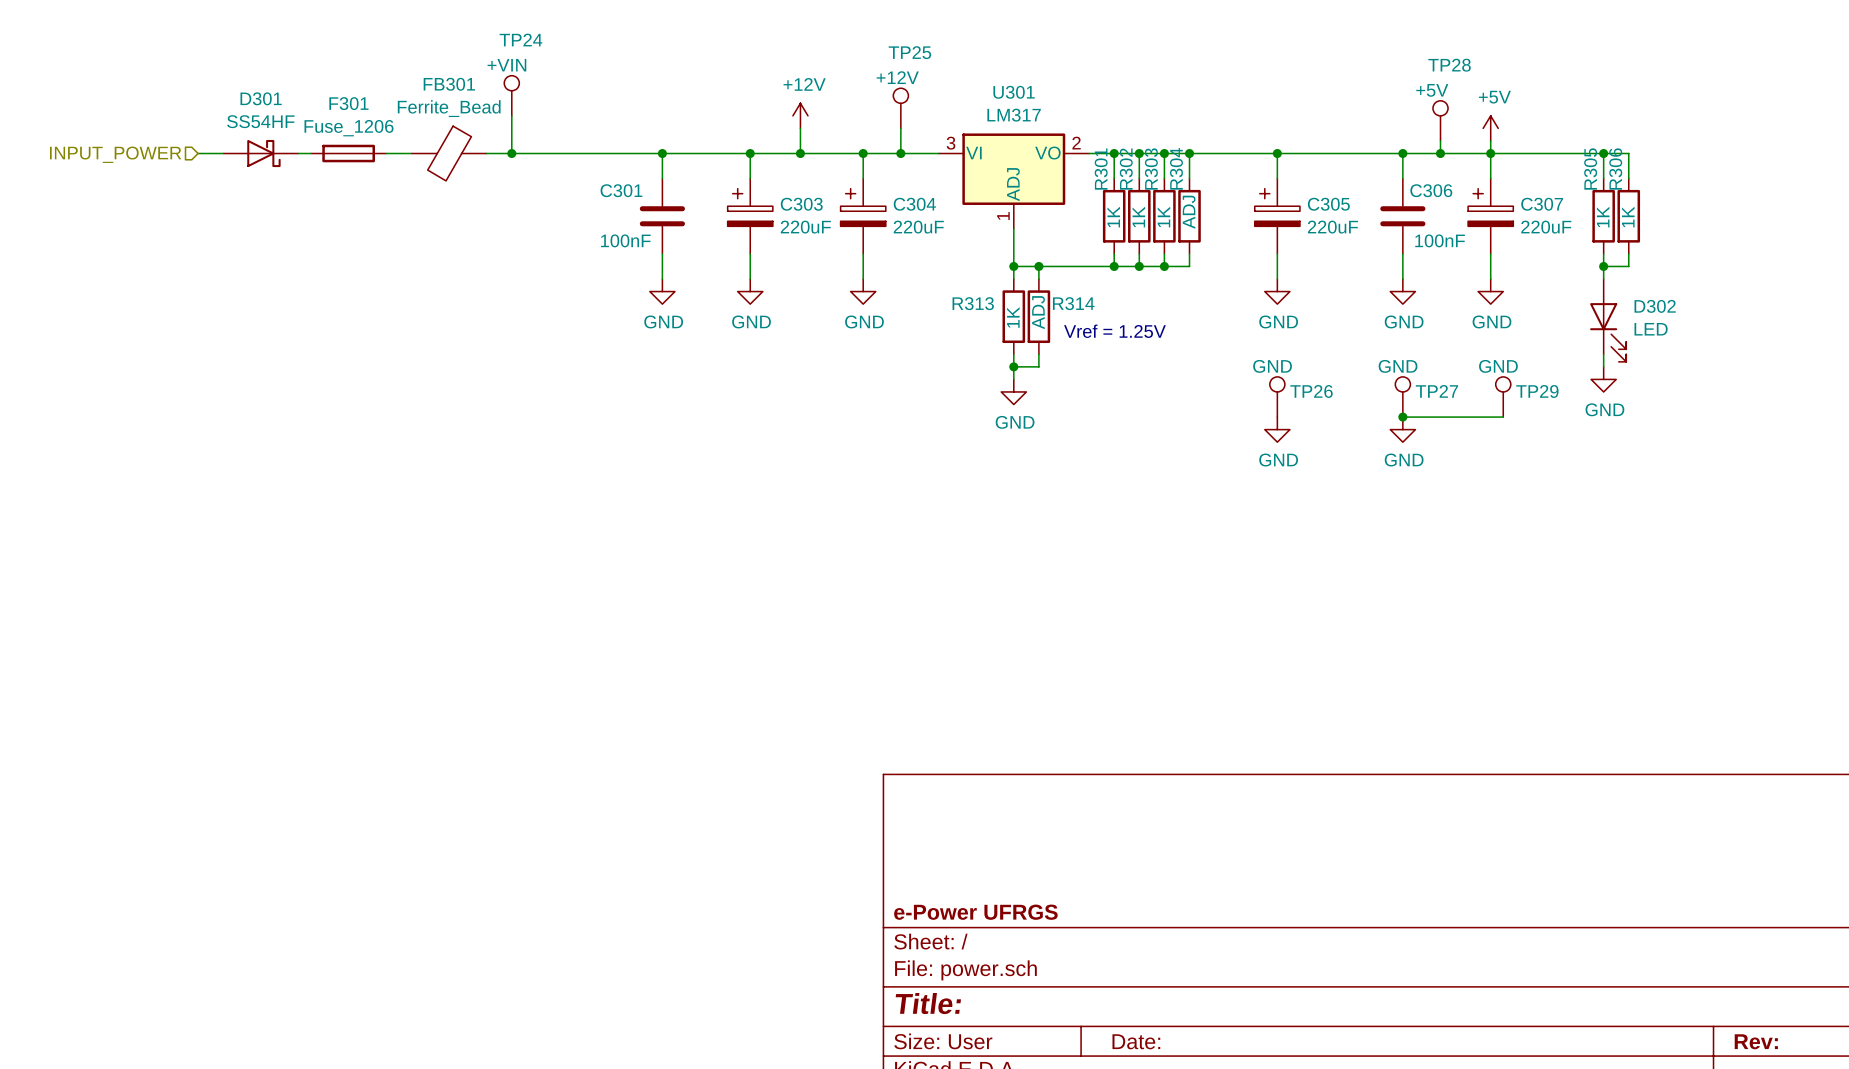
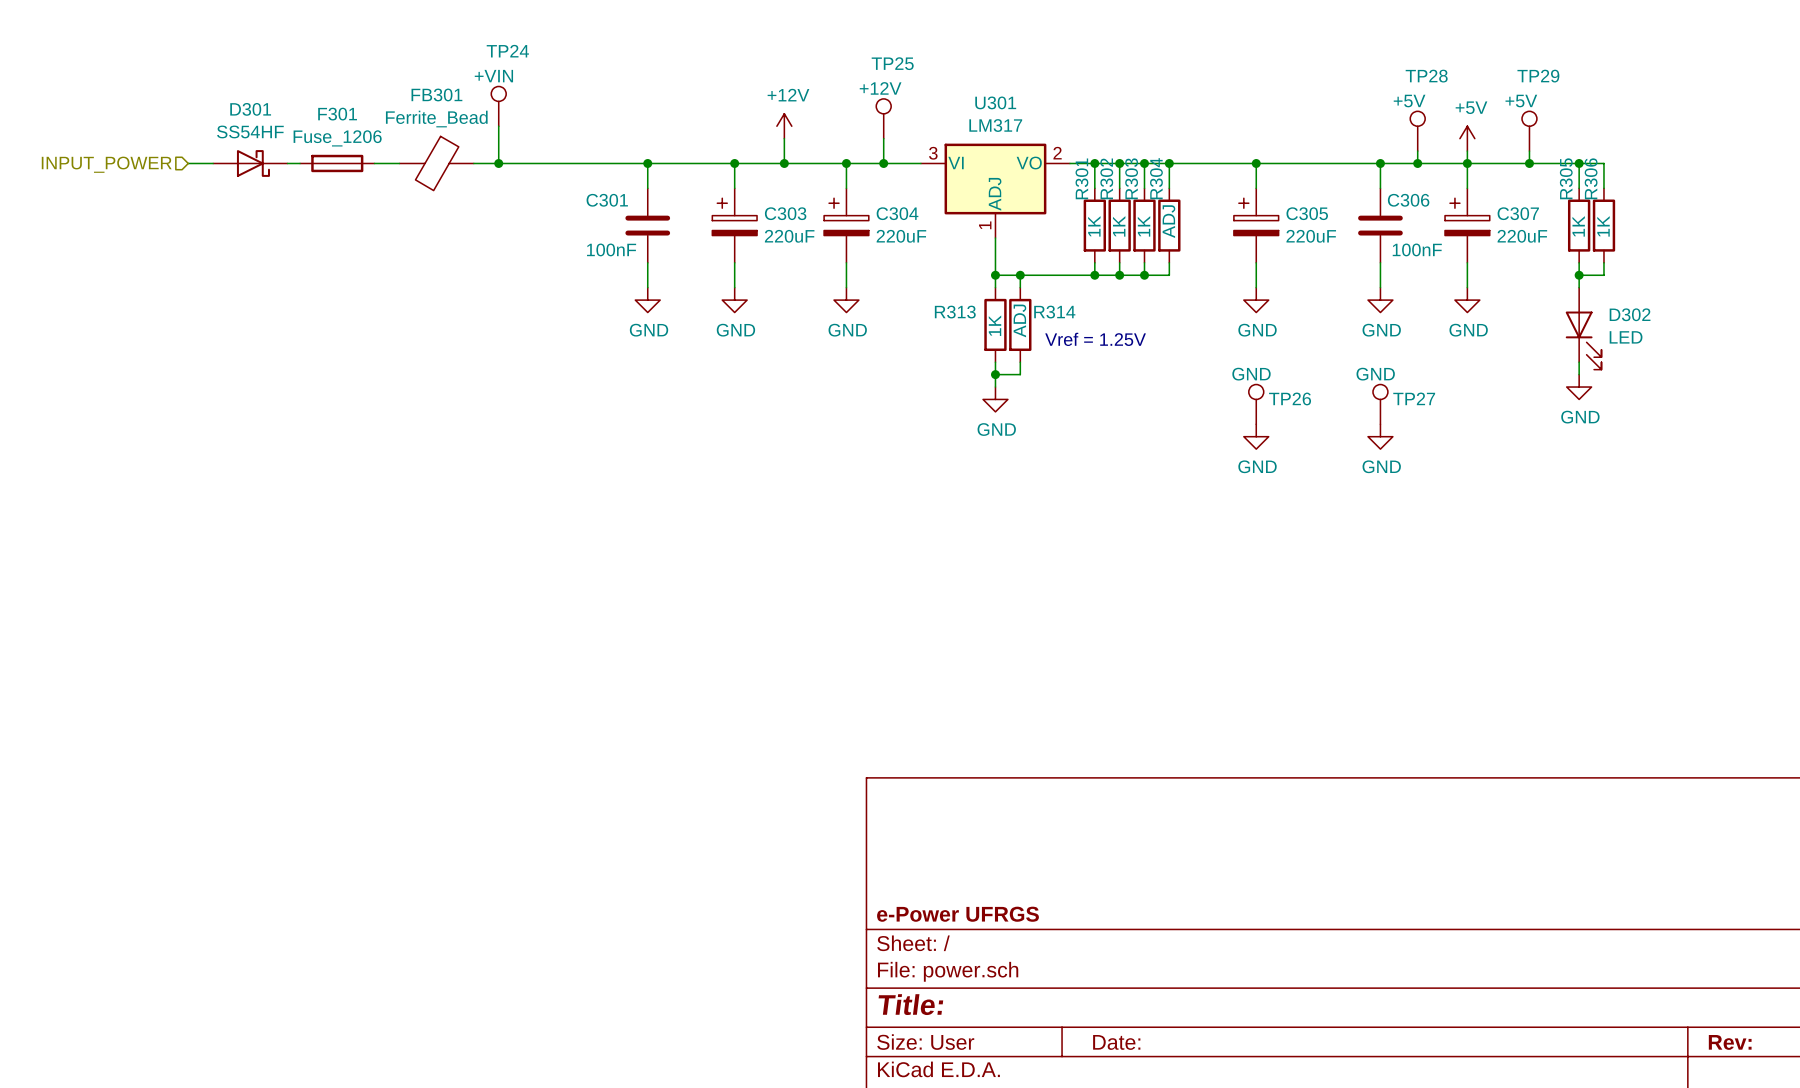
wire: none -> (1529, 151) (1529, 163)
junction: none -> (1529, 163)
TP29 value: GND (1498, 366) -> +5V (1521, 101)
TP29 name position: TP29 (1537, 391) -> TP29 (1538, 76)
TP29 position: (1503, 396) -> (1529, 131)
wire: (1402, 417) (1503, 417) -> none
junction: (1402, 417) -> none

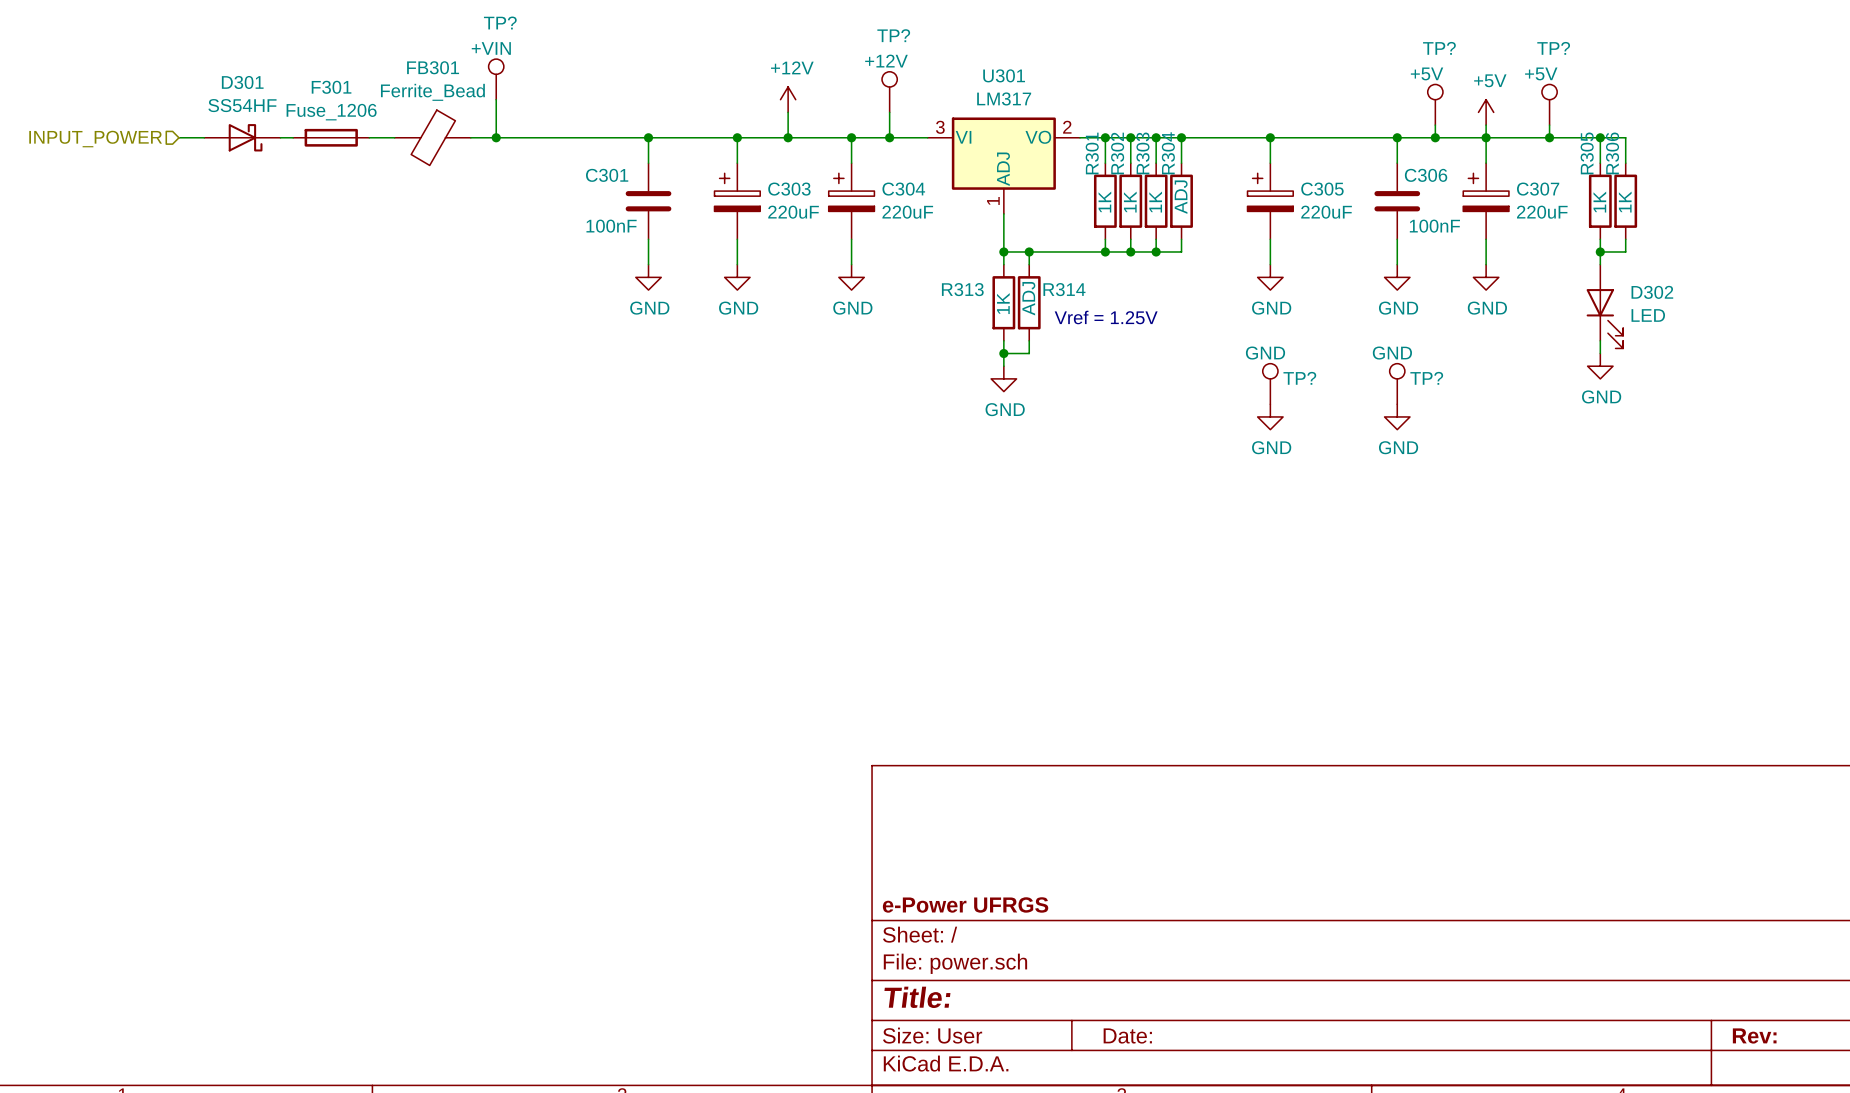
TP24 name: TP24 (507, 51) -> TP? (500, 22)
TP25 name: TP25 (892, 63) -> TP? (893, 35)
TP28 name: TP28 (1426, 76) -> TP? (1439, 48)
TP29 name: TP29 (1538, 76) -> TP? (1553, 48)
TP26 name: TP26 (1290, 398) -> TP? (1299, 378)
TP27 name: TP27 (1414, 398) -> TP? (1426, 378)

